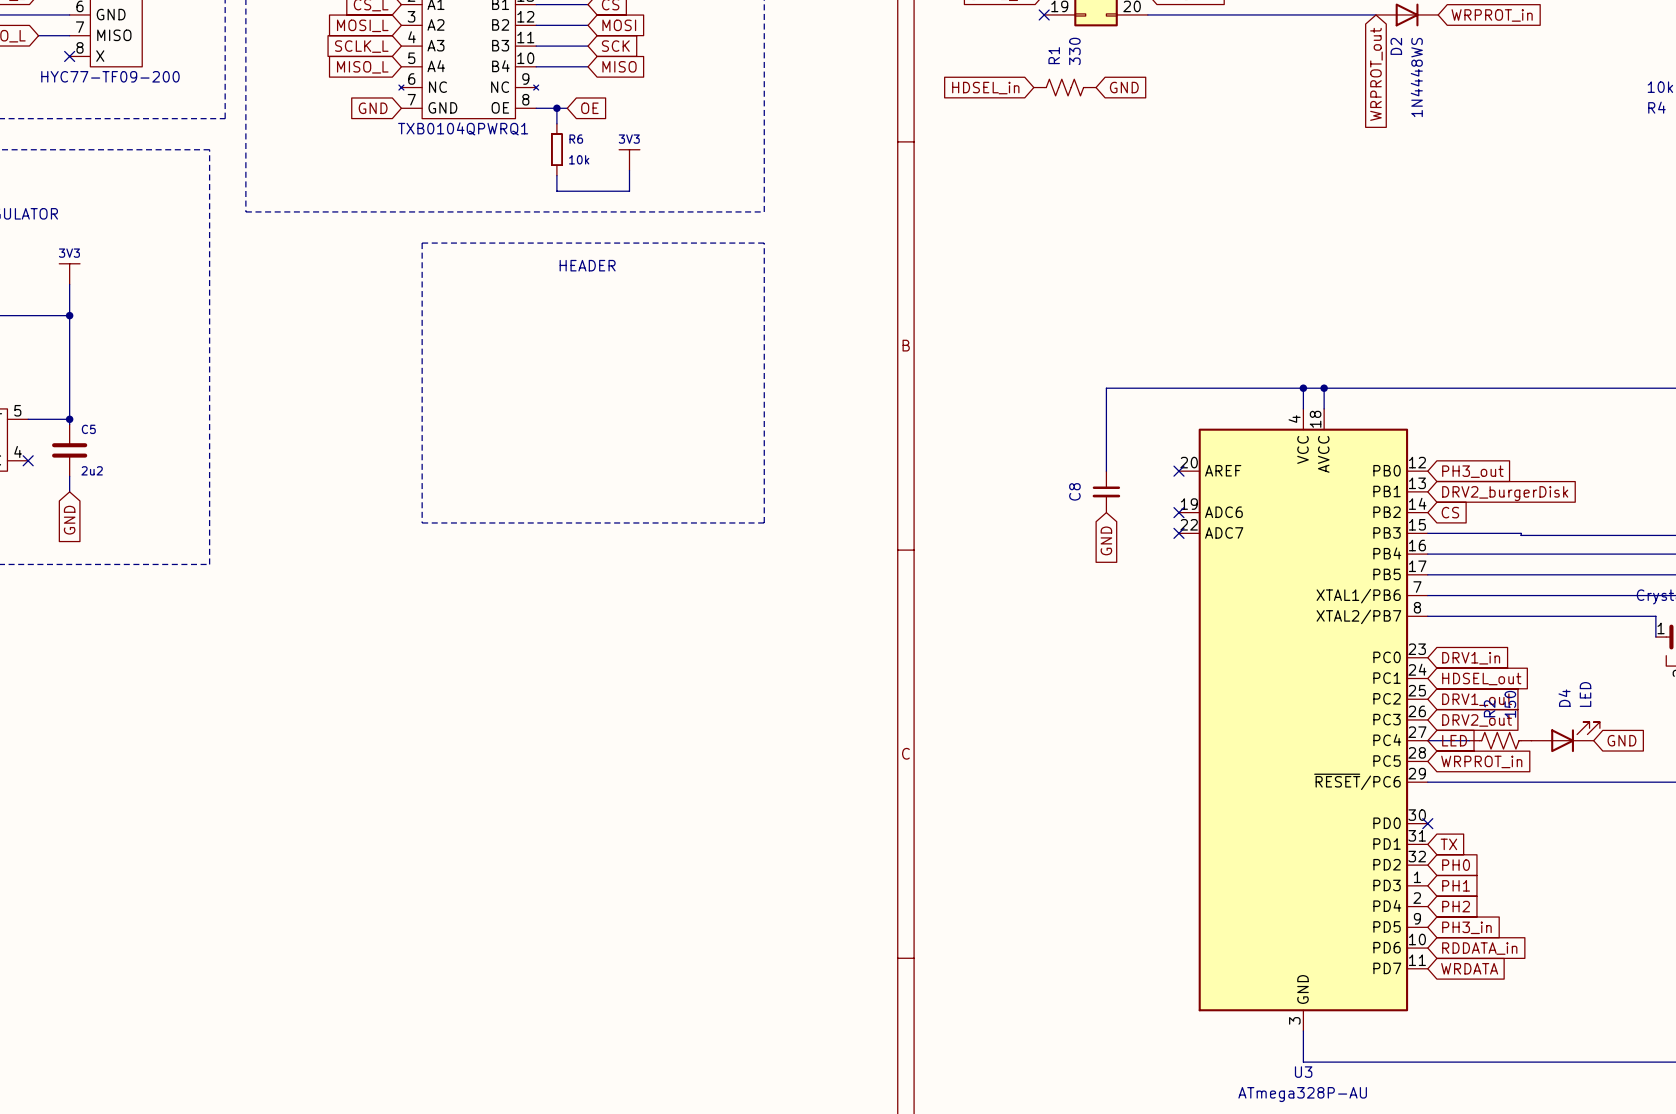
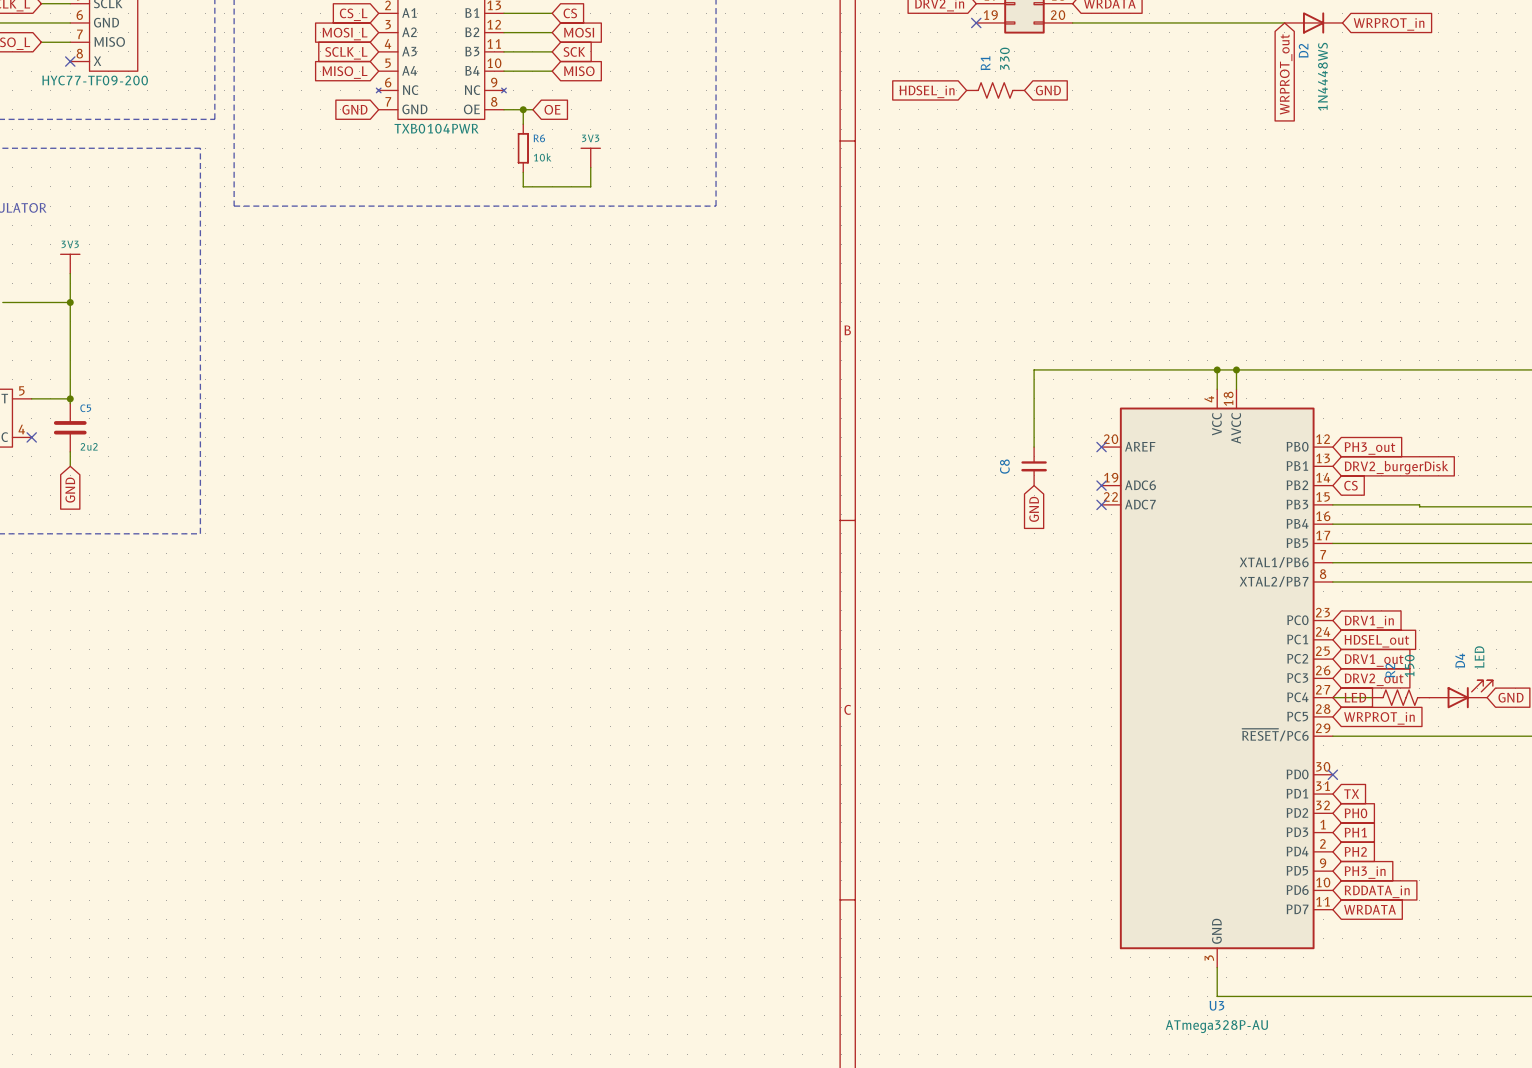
part value: TXB0104QPWRQ1 (463, 128) -> TXB0104PWR (436, 128)
line: (422, 243) (764, 243) (764, 522) (422, 522) (422, 243) -> none
text: HEADER (587, 265) -> none

